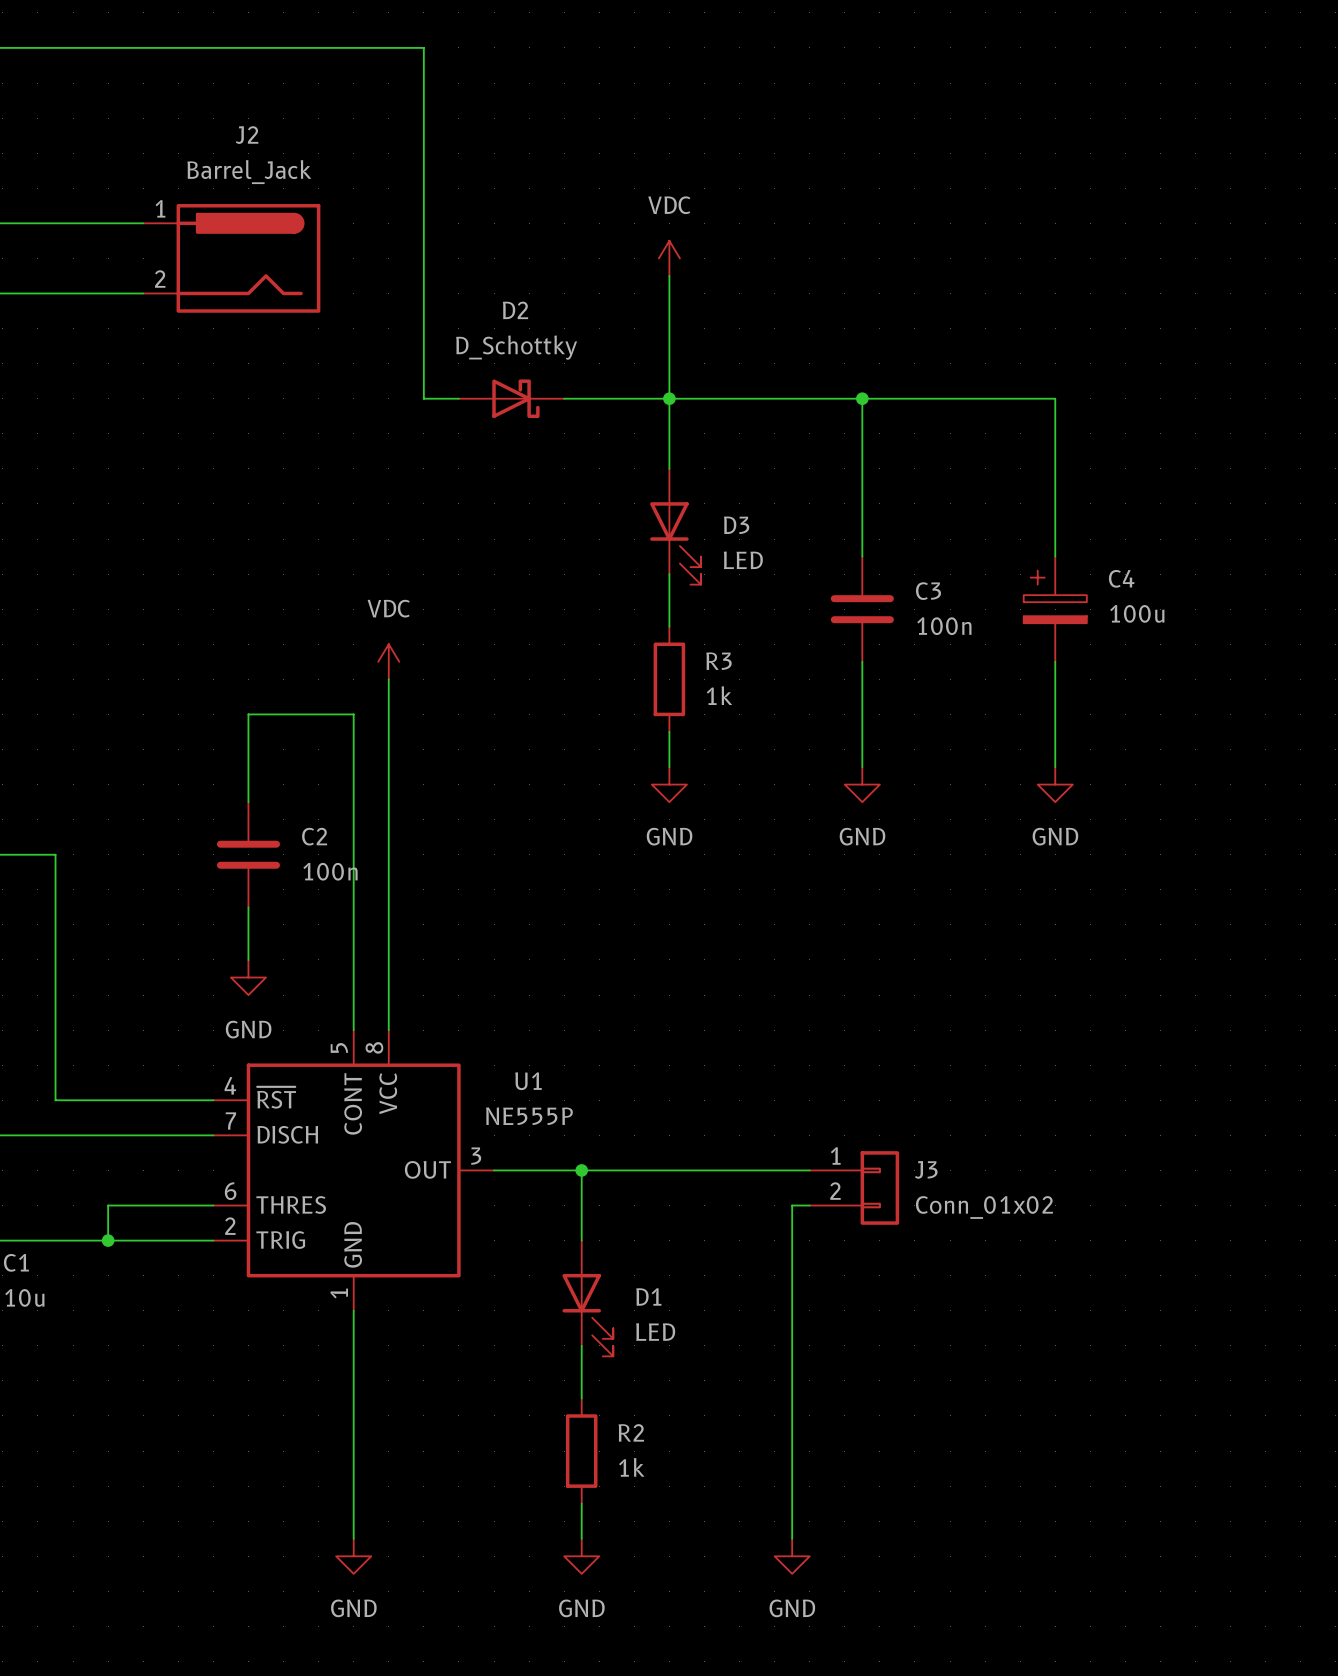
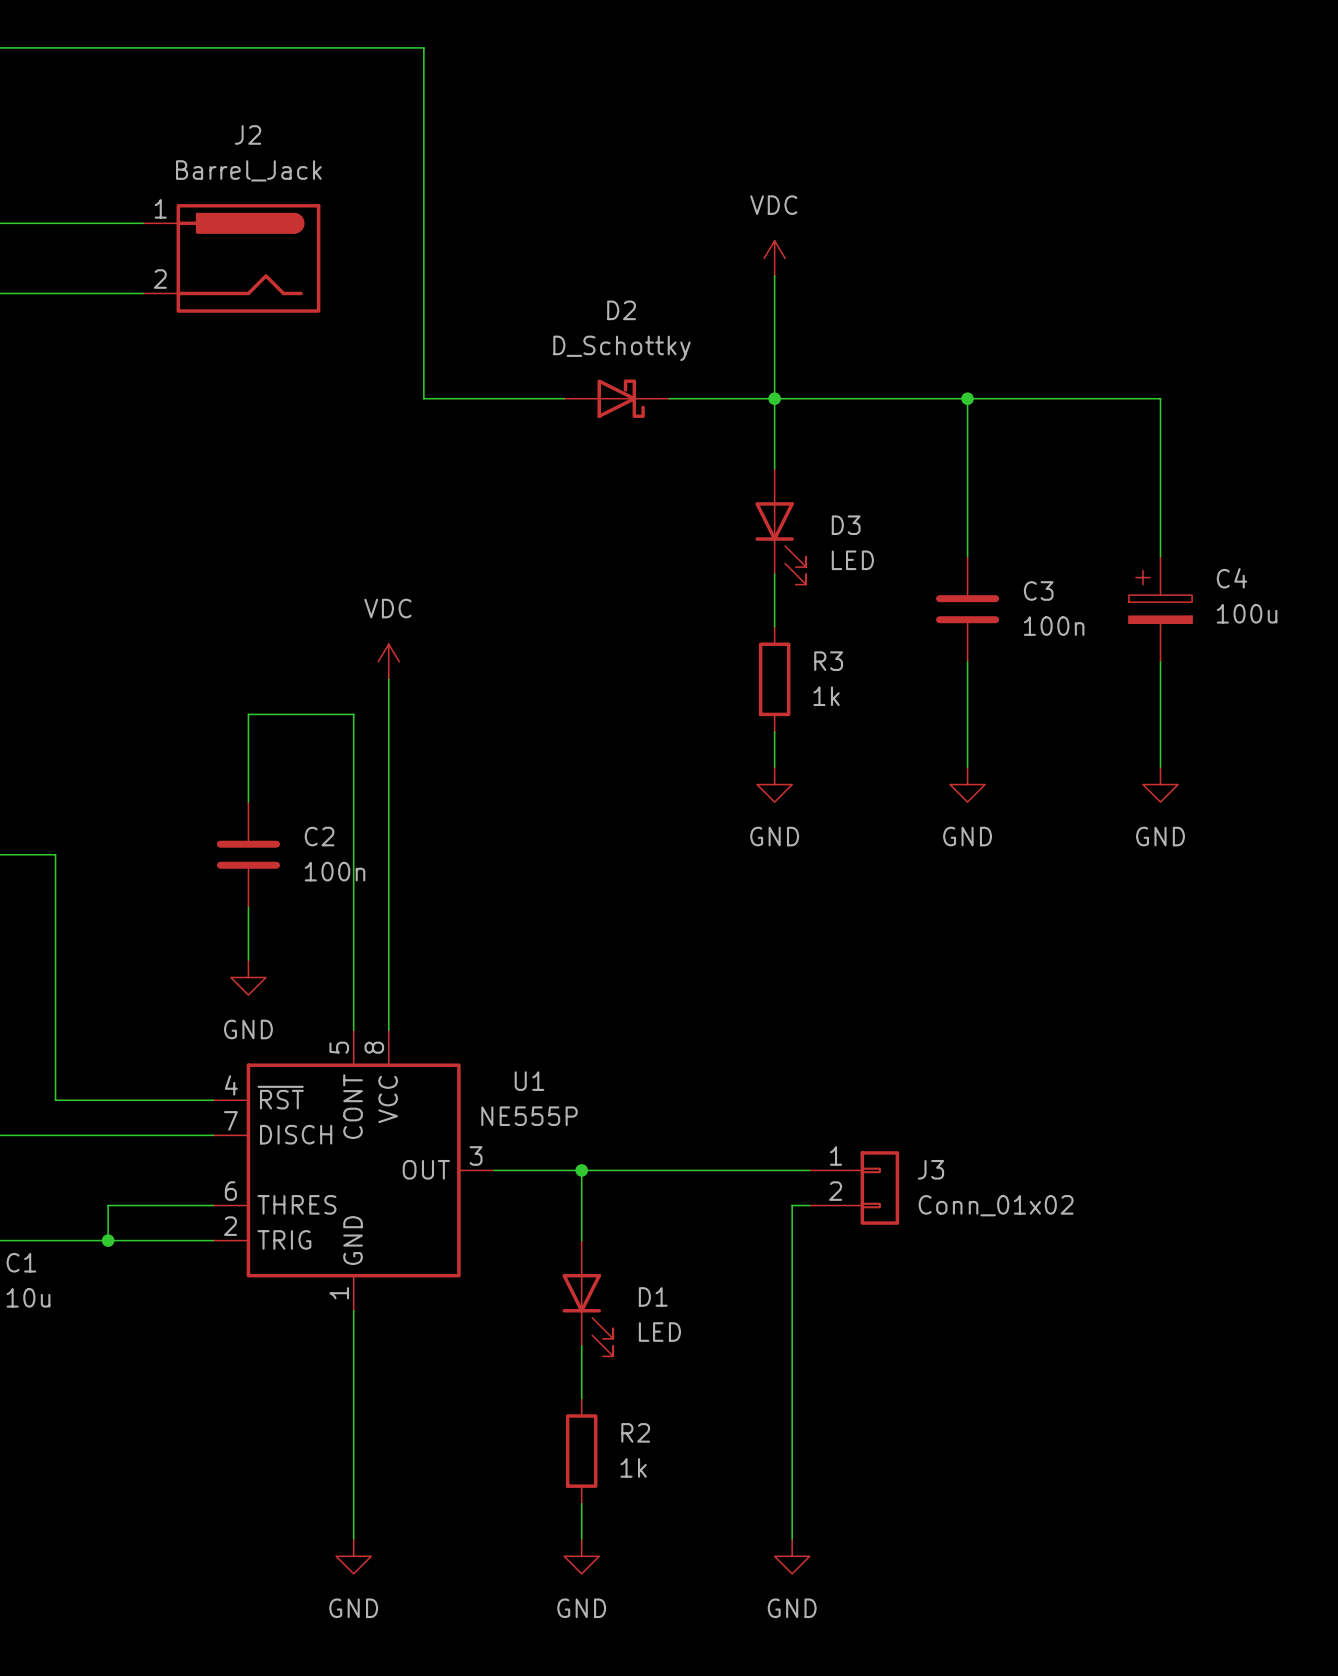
power symbol position: VDC (669, 258) -> VDC (774, 258)
wire: (669, 275) (669, 468) -> (774, 275) (774, 468)
D2 position: (511, 398) -> (616, 398)
junction: (669, 398) -> none
junction: none -> (774, 398)
wire: (862, 398) (862, 556) -> (967, 398) (967, 556)
junction: (862, 398) -> none
junction: none -> (967, 398)
wire: (1055, 398) (1055, 556) -> (1055, 398) (1160, 398) (1160, 556)
D3 position: (675, 526) -> (780, 526)
wire: (669, 574) (669, 626) -> (774, 574) (774, 626)
C3 position: (862, 609) -> (967, 609)
C4 position: (1055, 609) -> (1160, 609)
wire: (862, 661) (862, 767) -> (967, 661) (967, 767)
wire: (1055, 661) (1055, 767) -> (1160, 661) (1160, 767)
R3 position: (669, 679) -> (774, 679)
wire: (669, 731) (669, 767) -> (774, 731) (774, 767)
power symbol: GND (669, 784) -> none
power symbol: none -> GND (774, 784)
power symbol: GND (862, 784) -> none
power symbol: none -> GND (967, 784)
power symbol: GND (1055, 784) -> none
power symbol: none -> GND (1160, 784)

